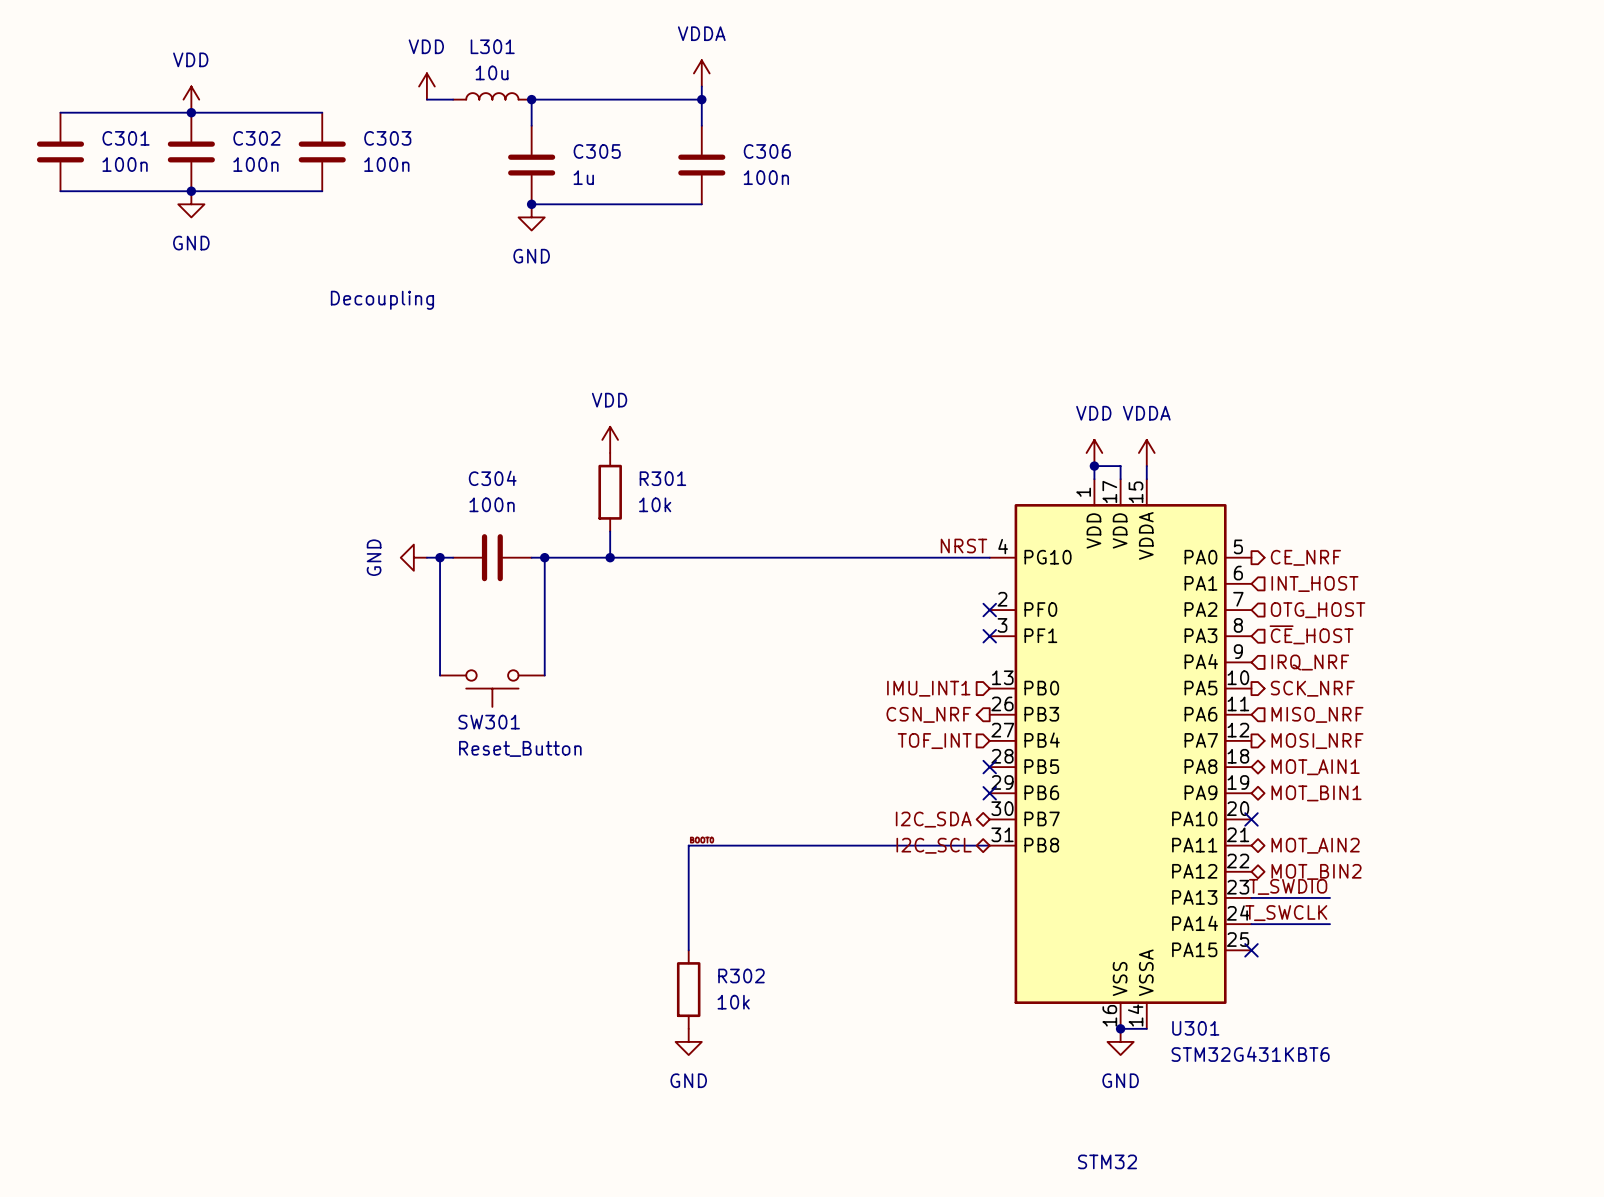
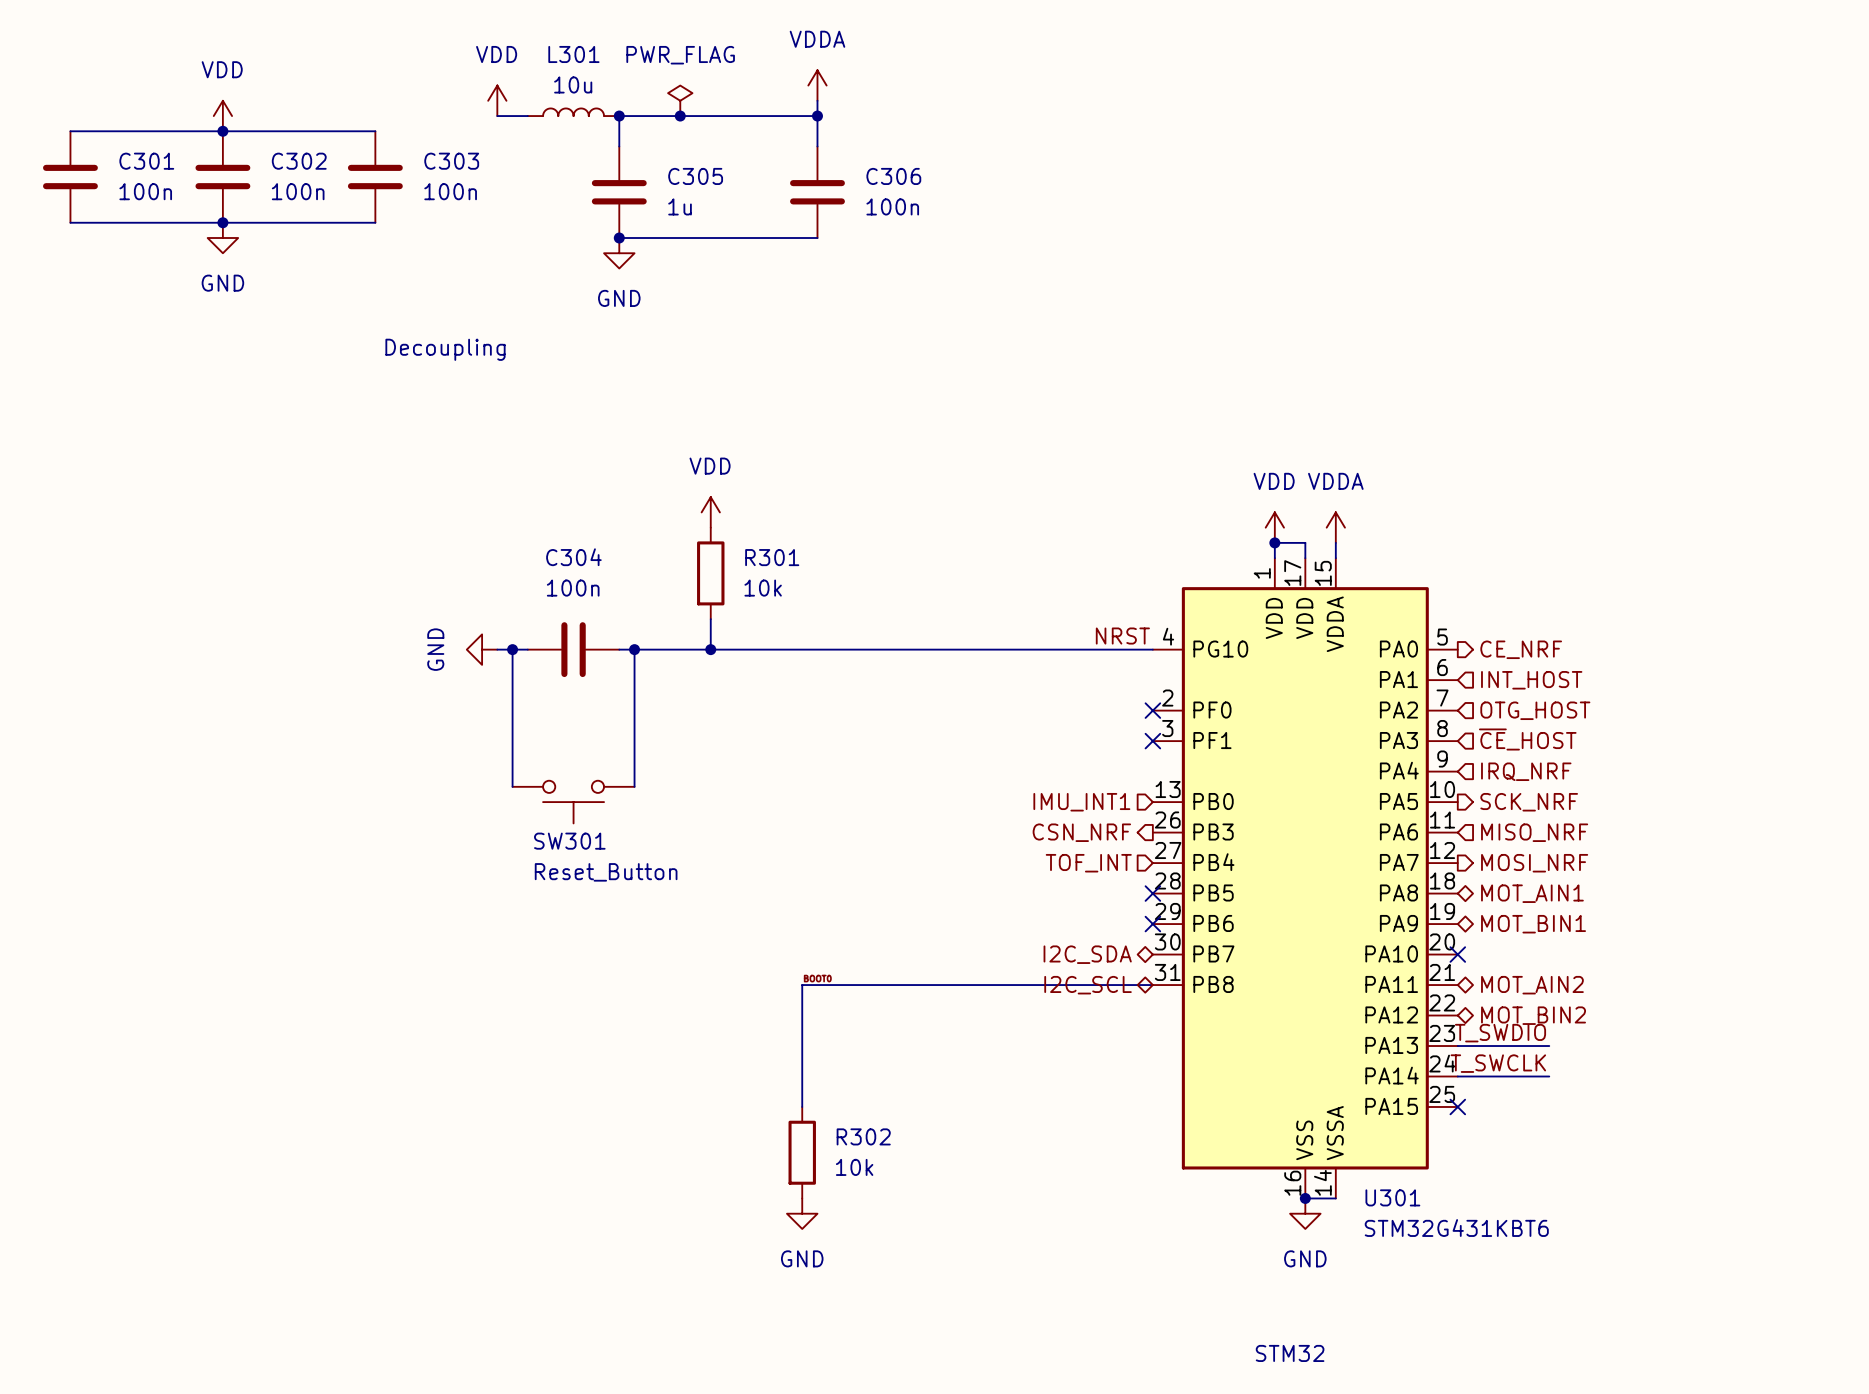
power symbol: none -> PWR_FLAG (680, 100)
junction: none -> (680, 116)

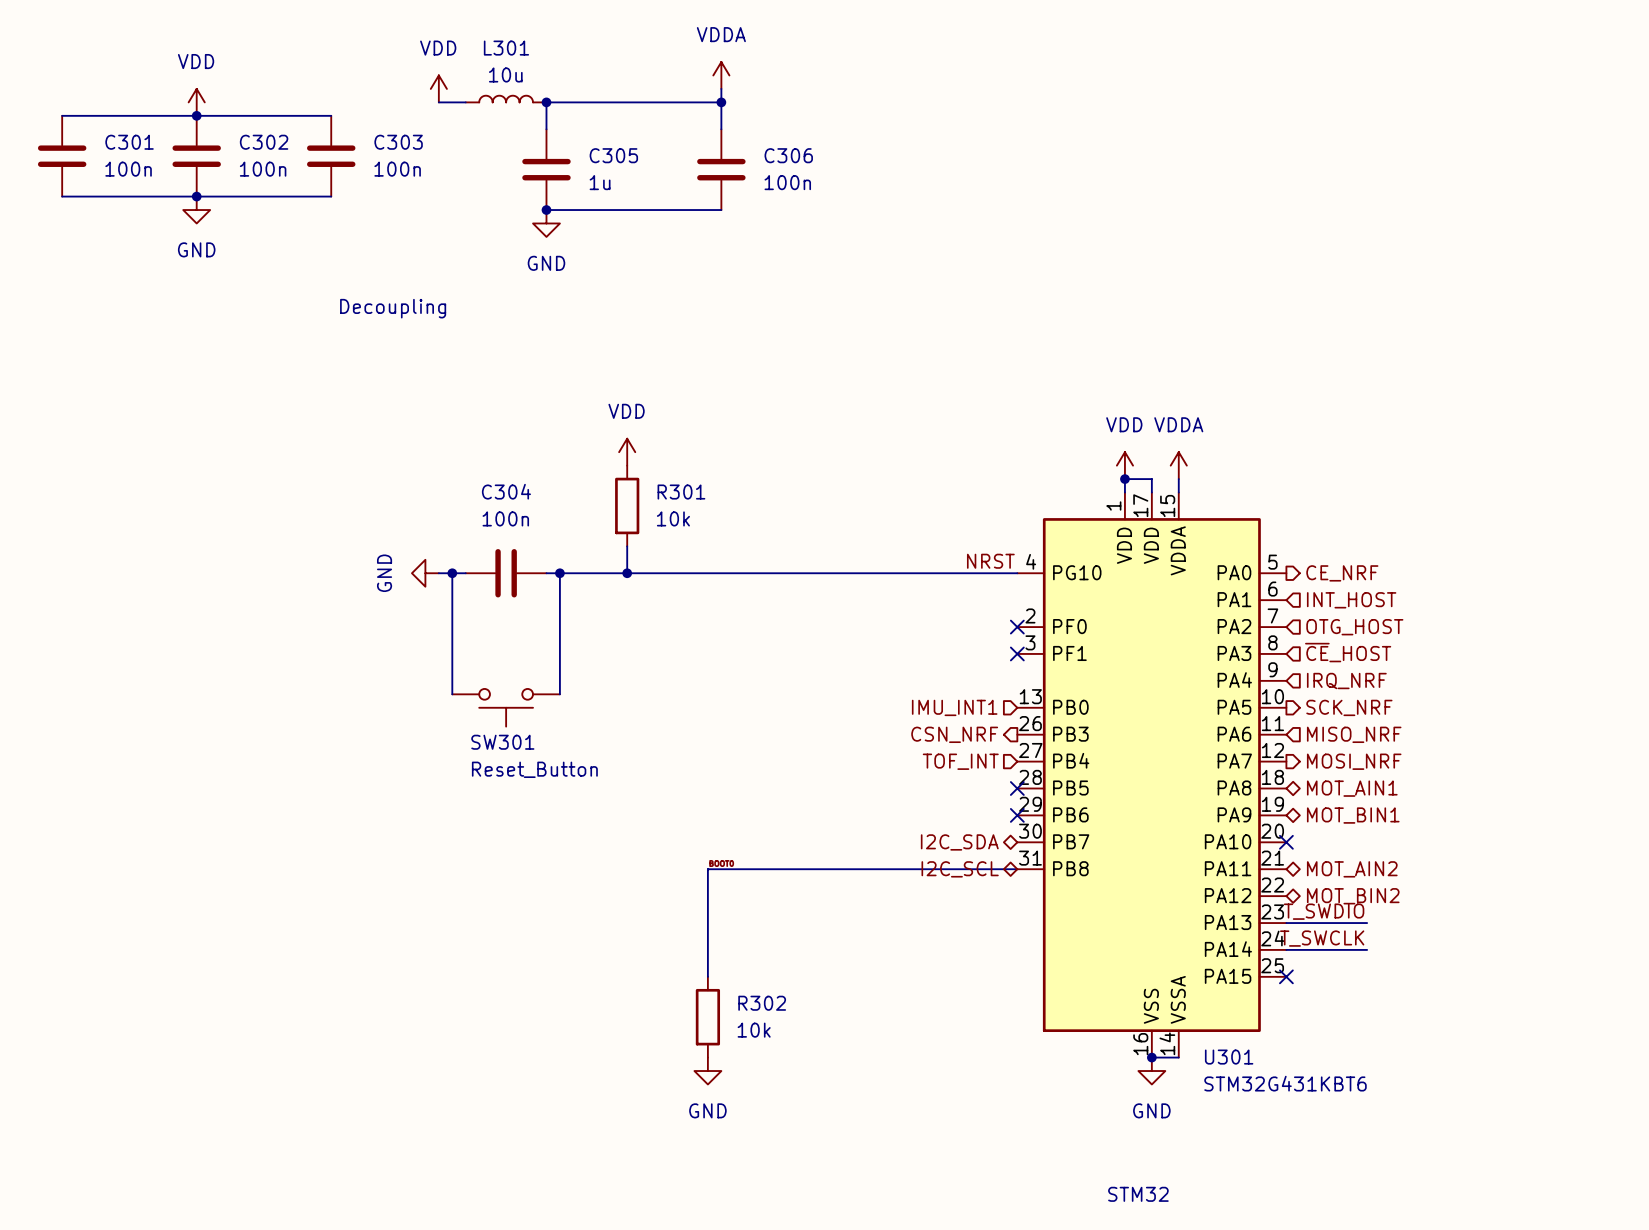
power symbol: PWR_FLAG (680, 100) -> none
junction: (680, 116) -> none

